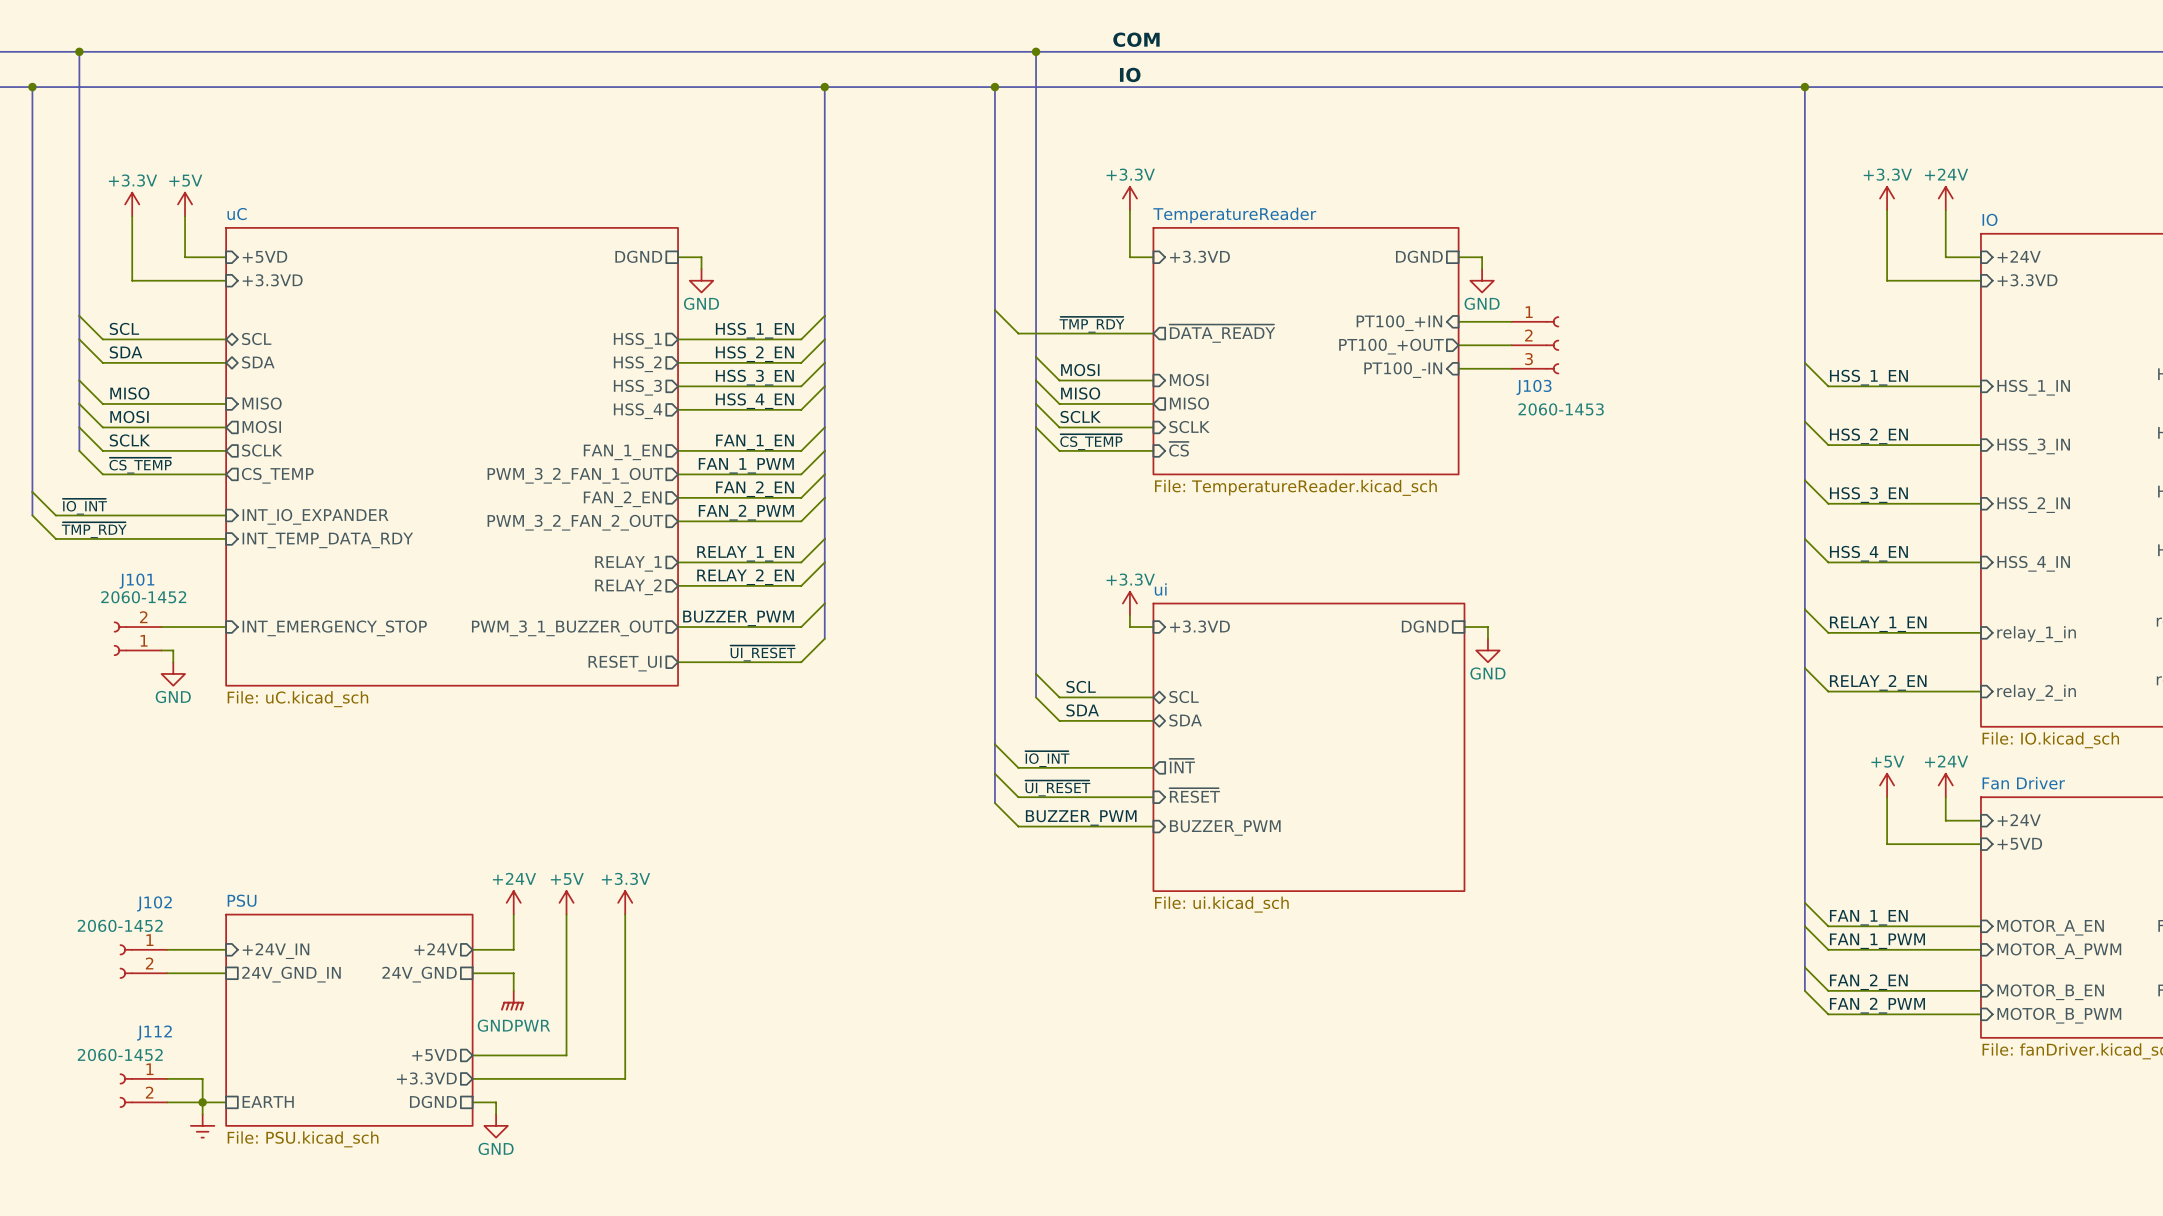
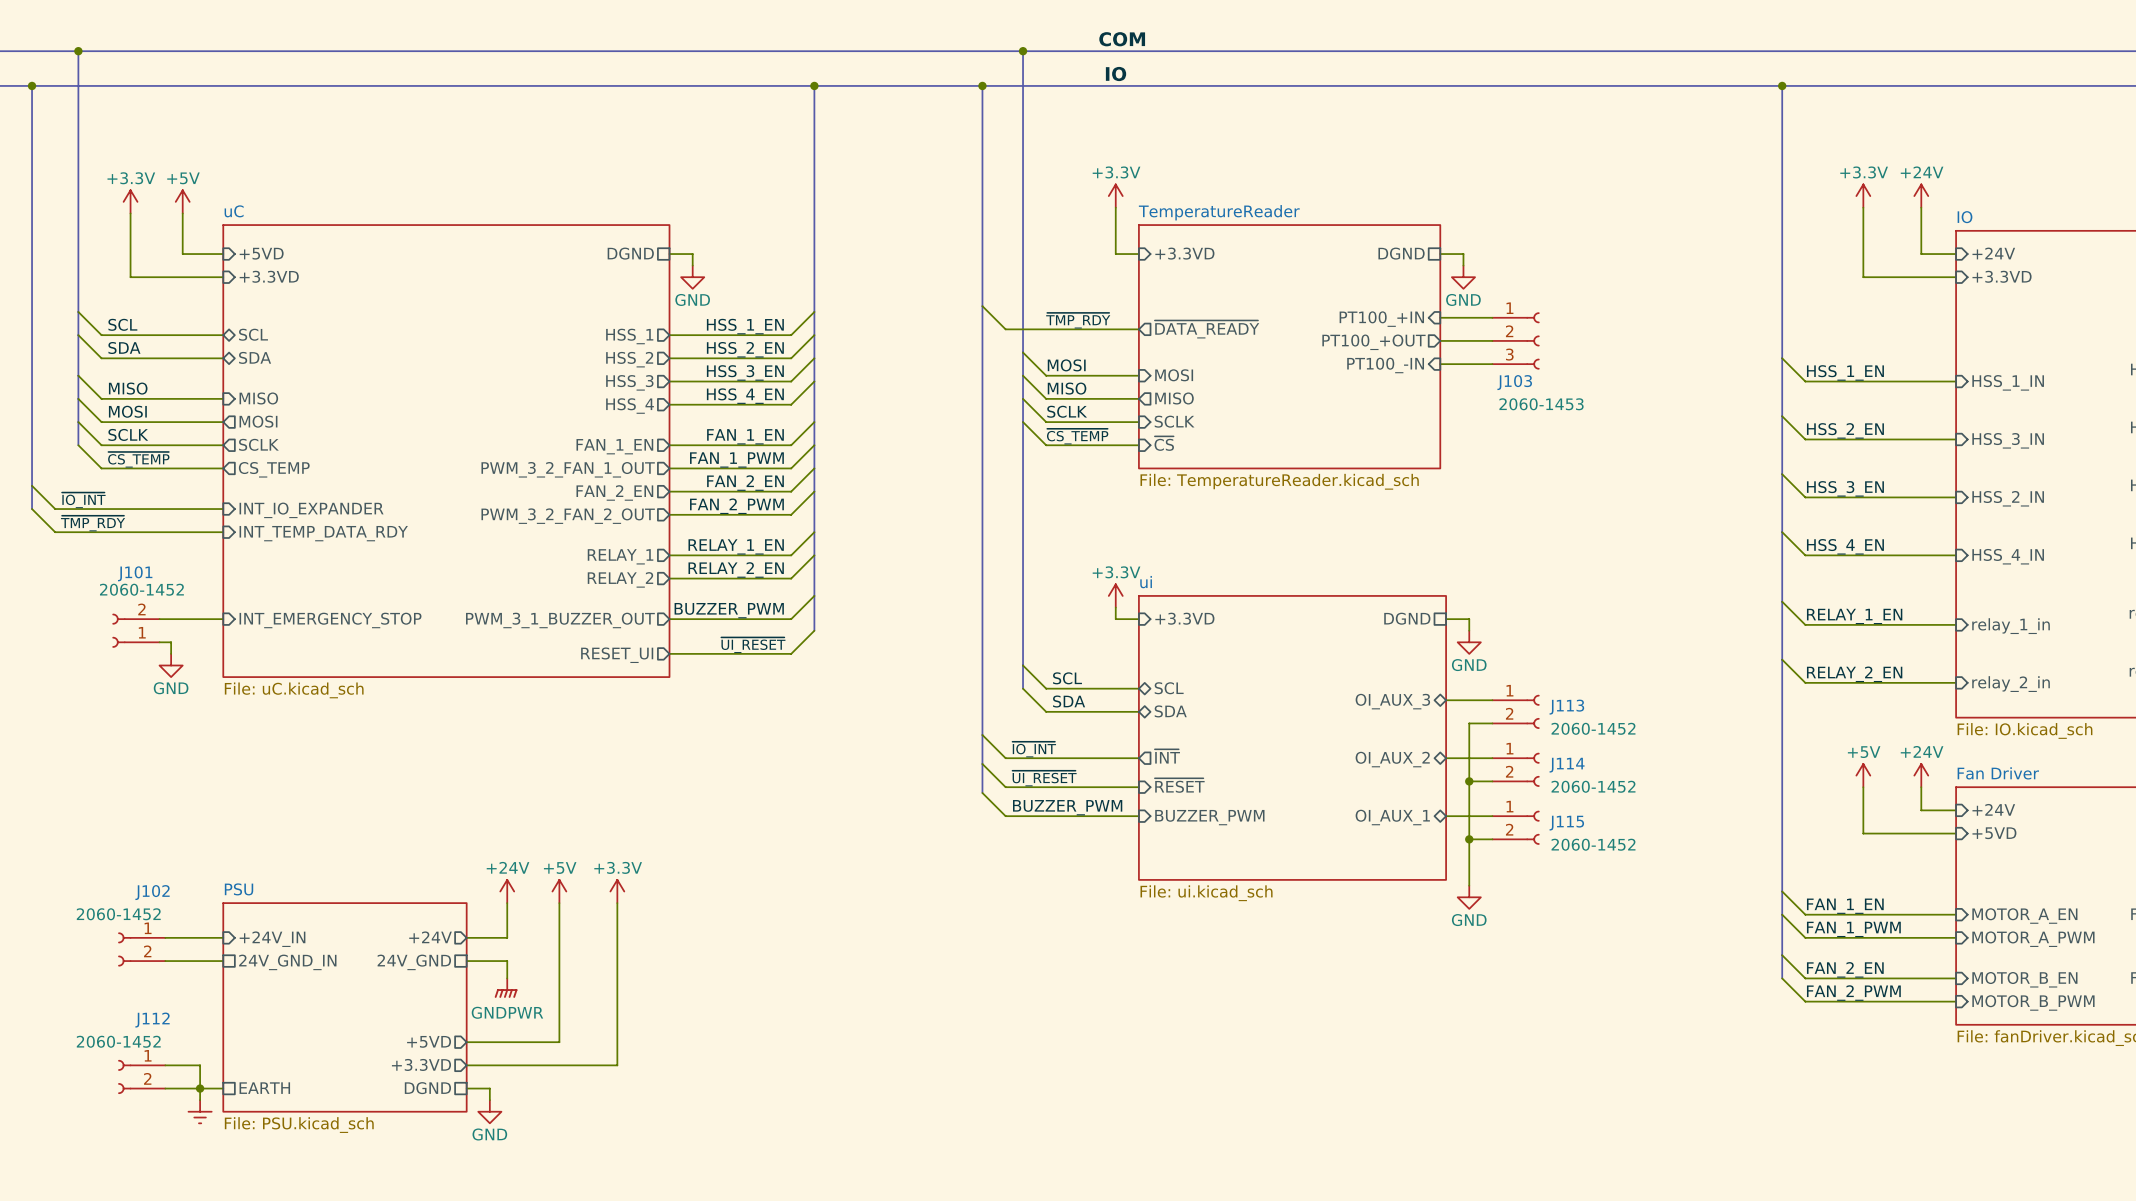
wire: none -> (1446, 700) (1492, 700)
sheet pin: none -> OI_AUX_3 (1392, 701)
J113: none -> 2060-1452 (1515, 711)
wire: none -> (1492, 723) (1469, 723) (1469, 885)
wire: none -> (1446, 758) (1492, 758)
sheet pin: none -> OI_AUX_2 (1392, 759)
J114: none -> 2060-1452 (1515, 769)
wire: none -> (1469, 781) (1492, 781)
junction: none -> (1469, 781)
wire: none -> (1446, 816) (1492, 816)
sheet pin: none -> OI_AUX_1 (1392, 817)
J115: none -> 2060-1452 (1515, 827)
wire: none -> (1469, 839) (1492, 839)
junction: none -> (1469, 839)
power symbol: none -> GND (1469, 897)

